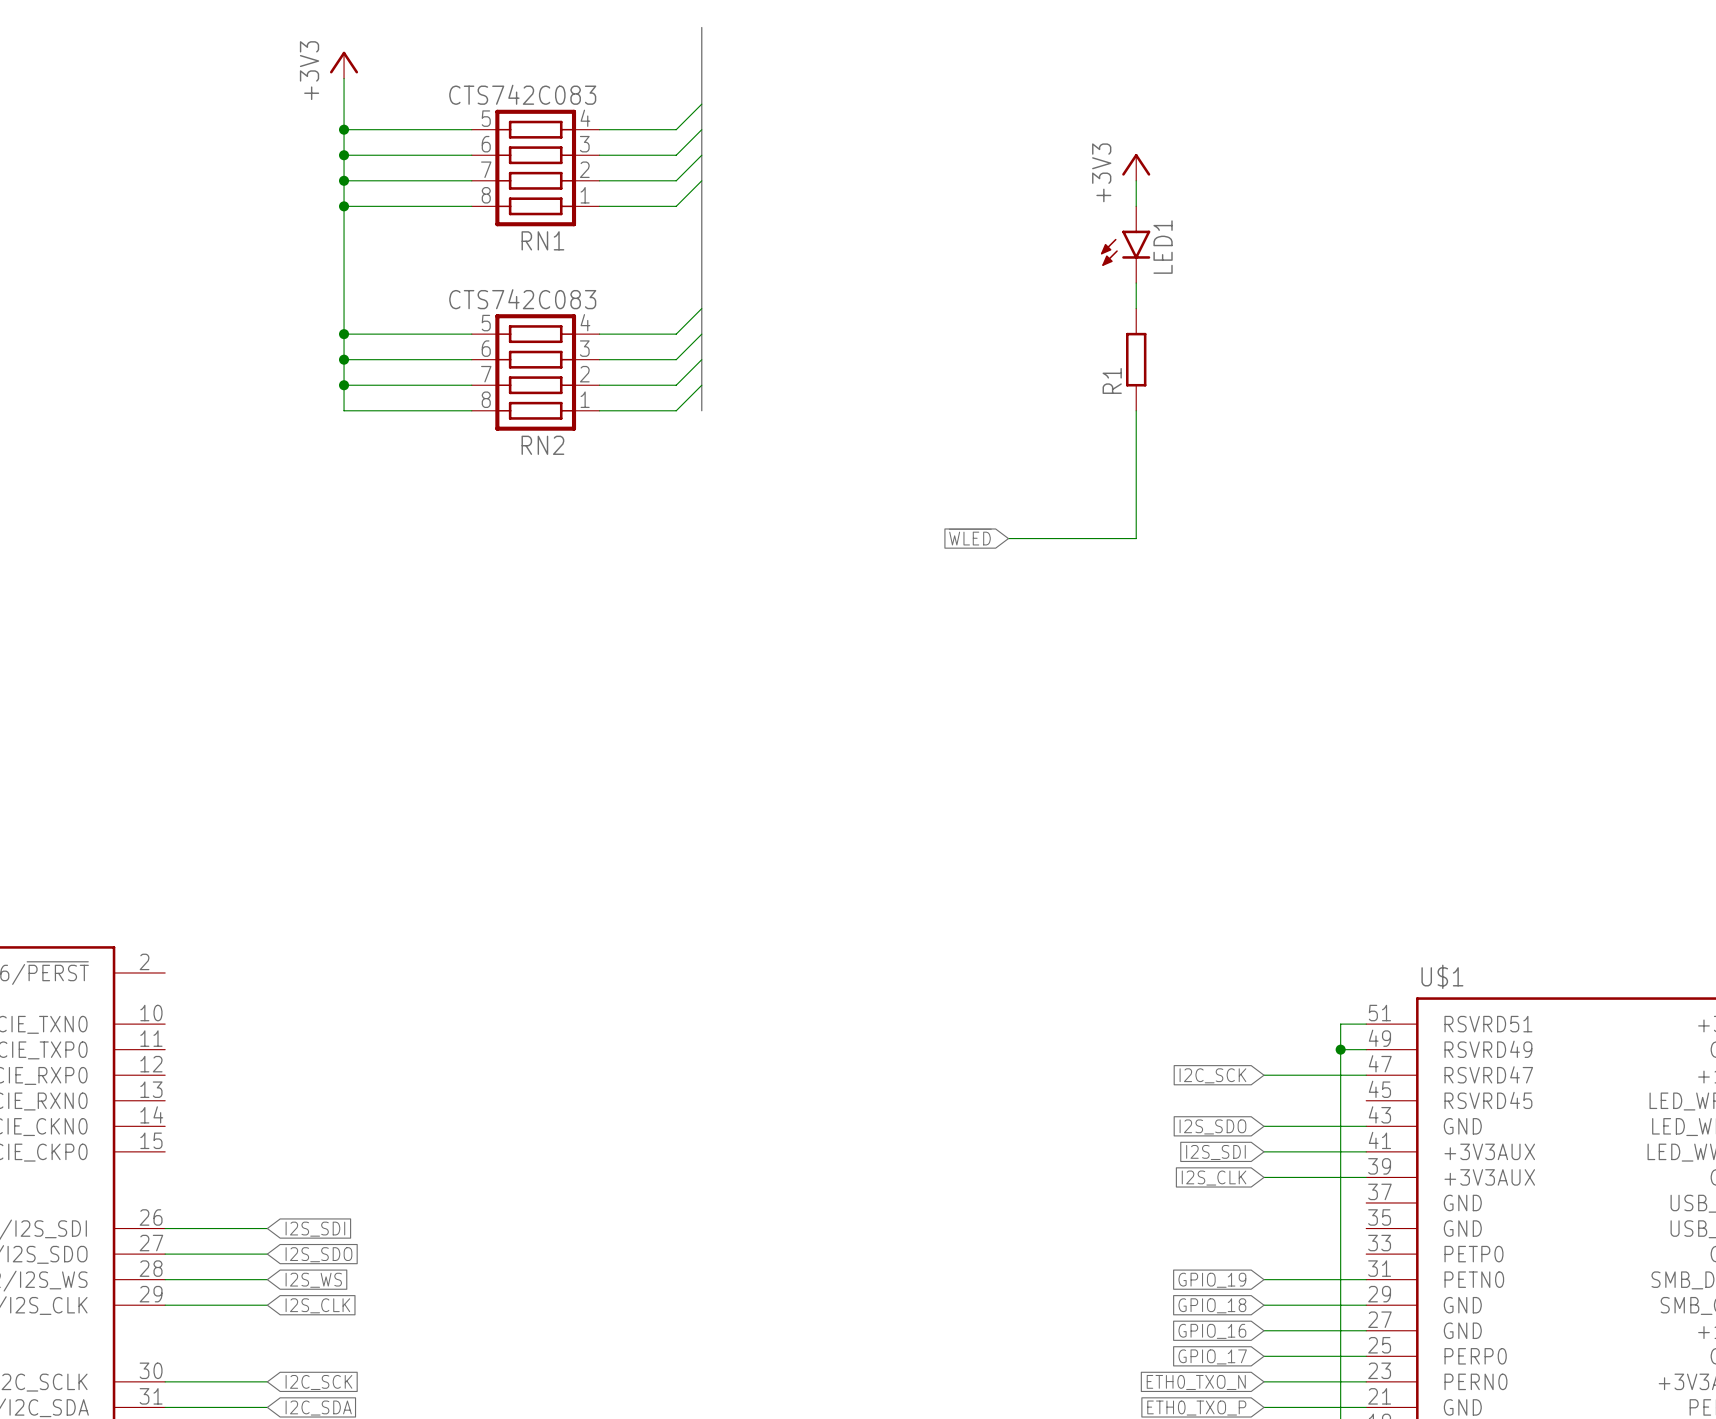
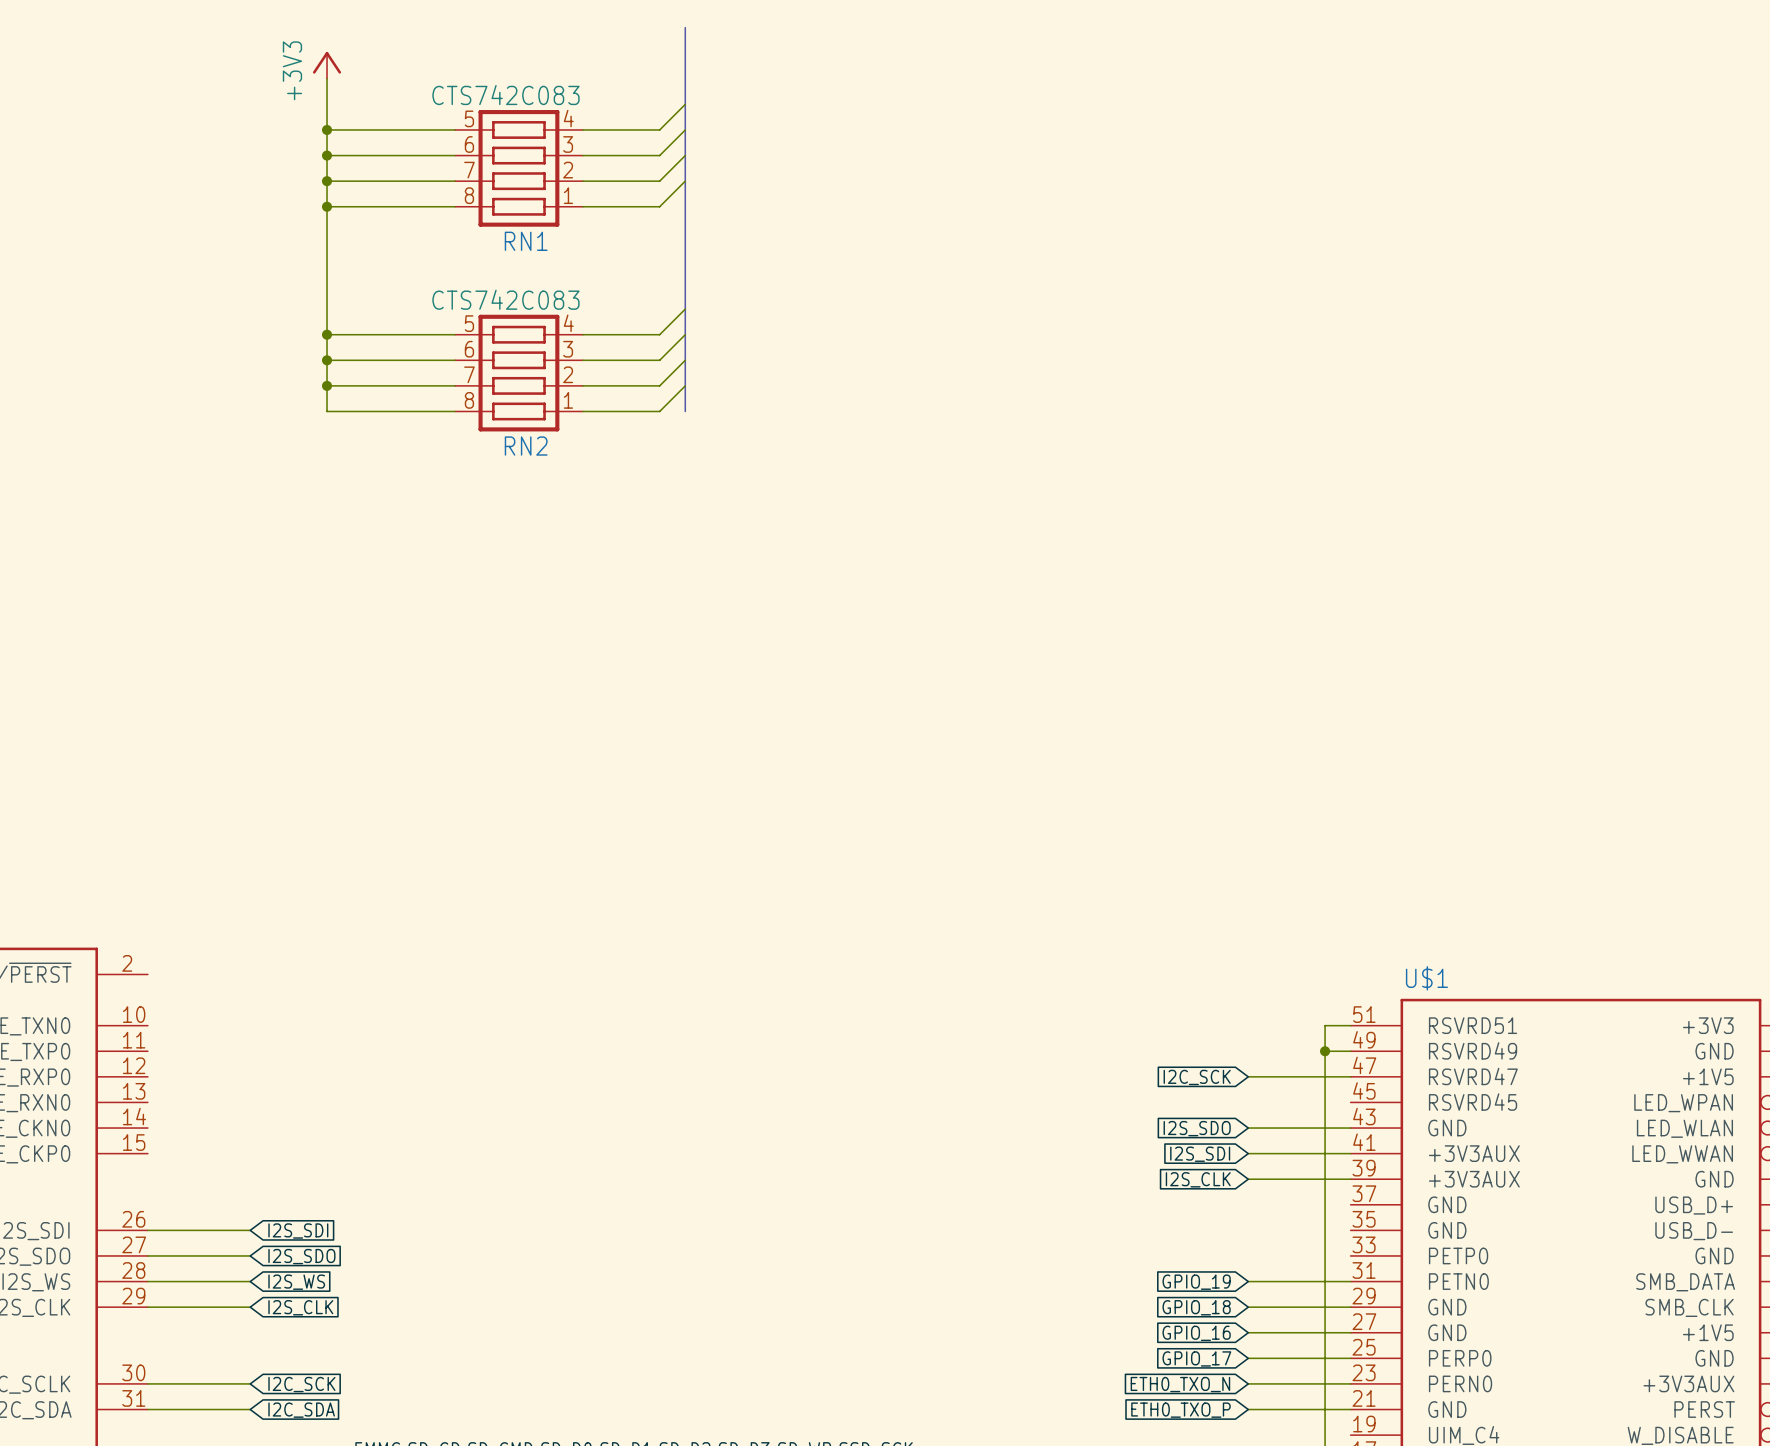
power symbol: +3V3 (1136, 167) -> none
wire: (1136, 180) (1136, 206) -> none
LED1: (1125, 244) -> none
wire: (1136, 283) (1136, 308) -> none
R1: (1136, 359) -> none
wire: (1136, 410) (1136, 538) (1008, 538) -> none
global label: ~{WLED} (970, 537) -> none

